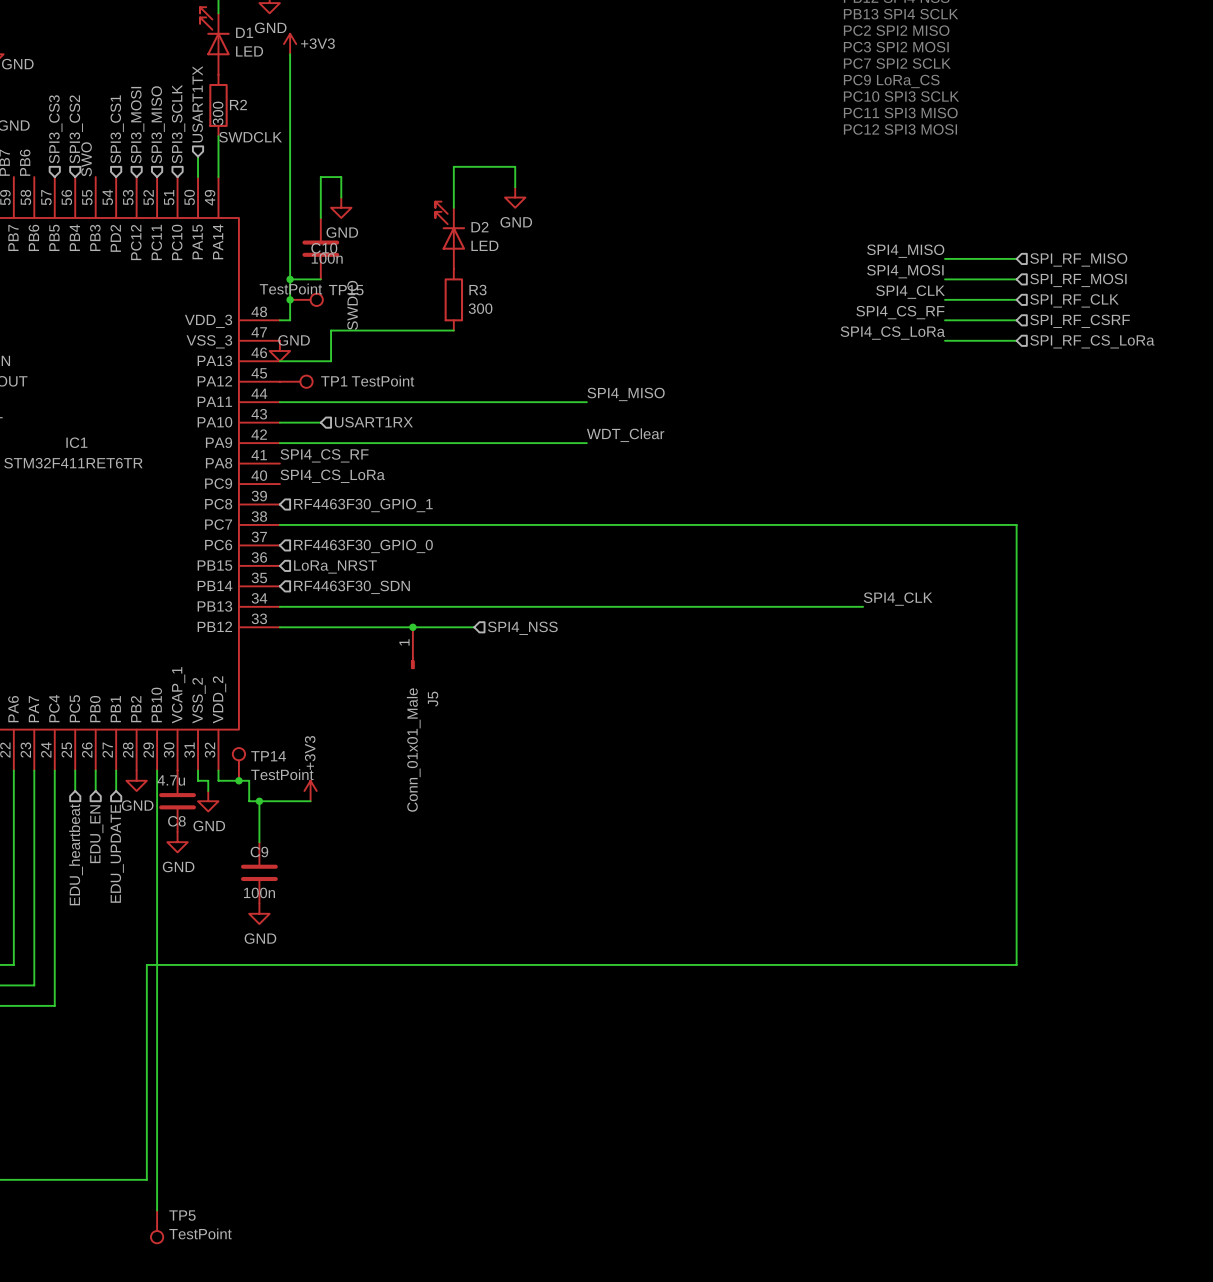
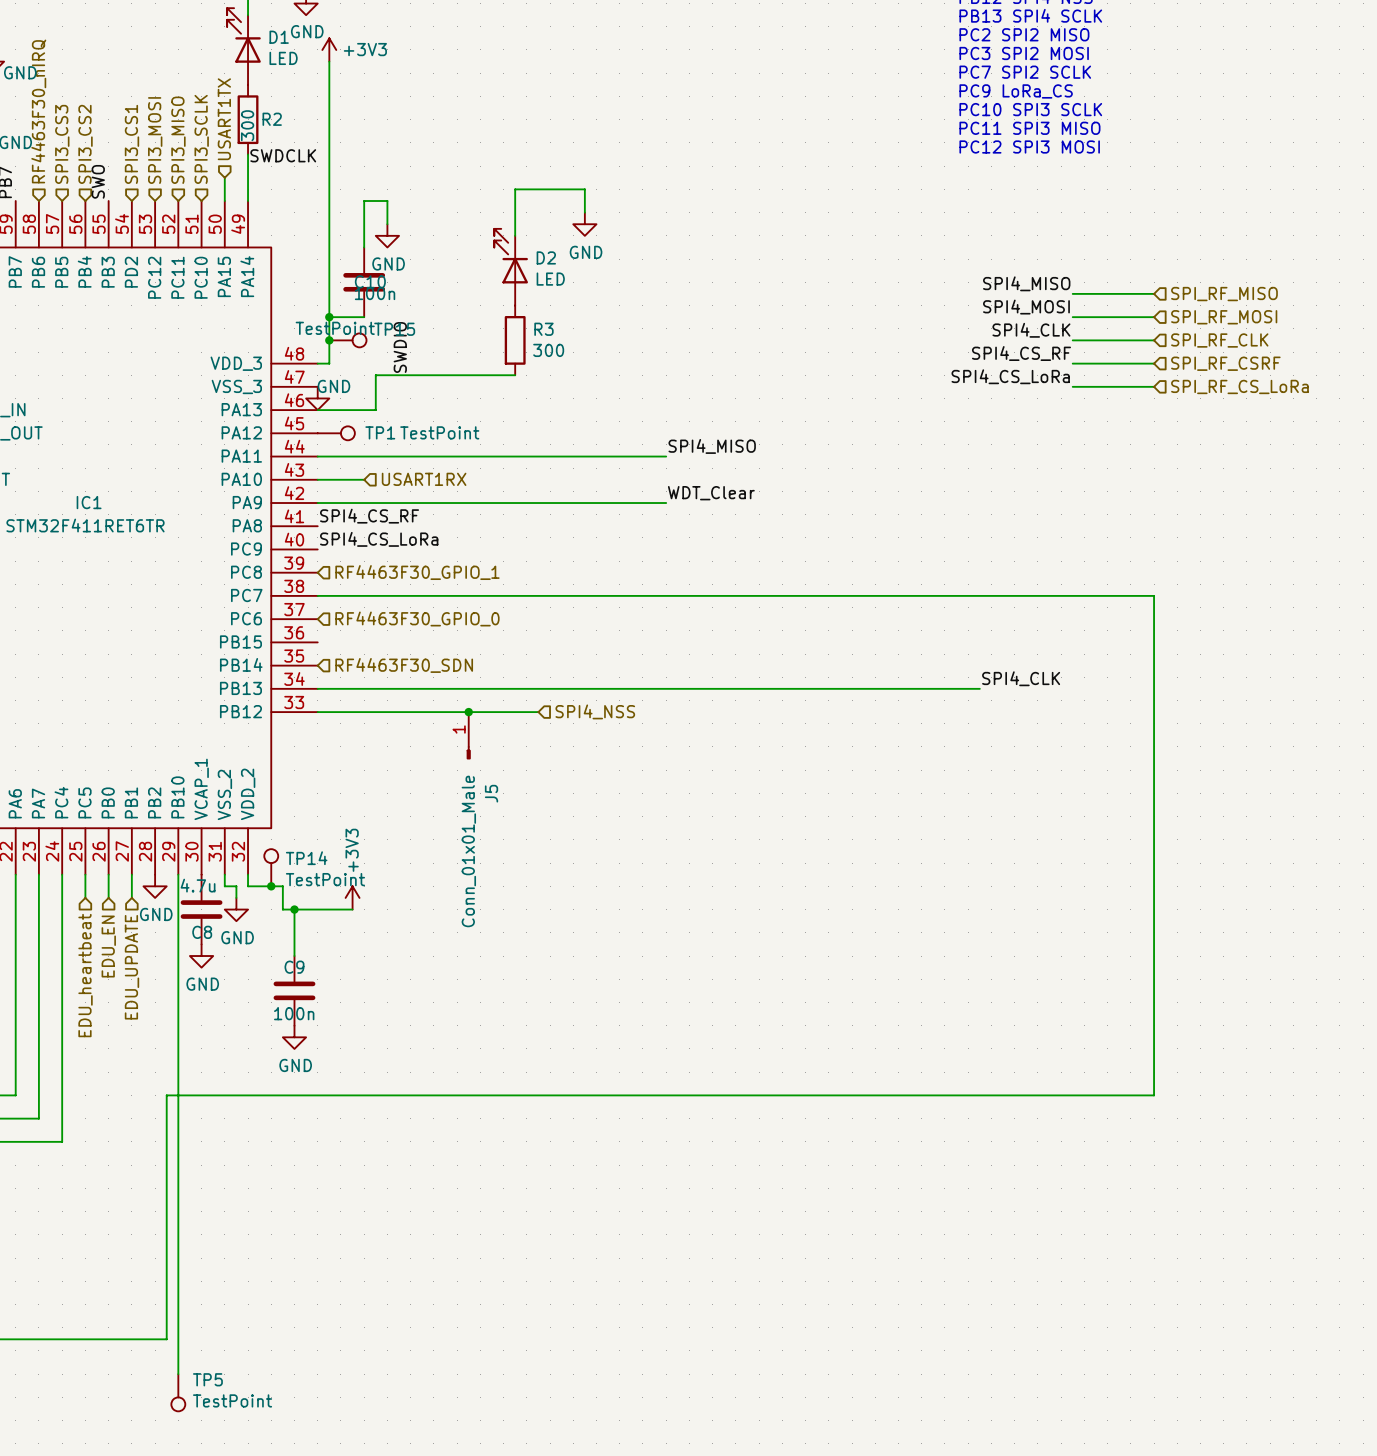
hierarchical label: none -> RF4463F30_nIRQ (38, 111)
label: PB6 (25, 162) -> none
hierarchical label: LoRa_NRST (335, 566) -> none

